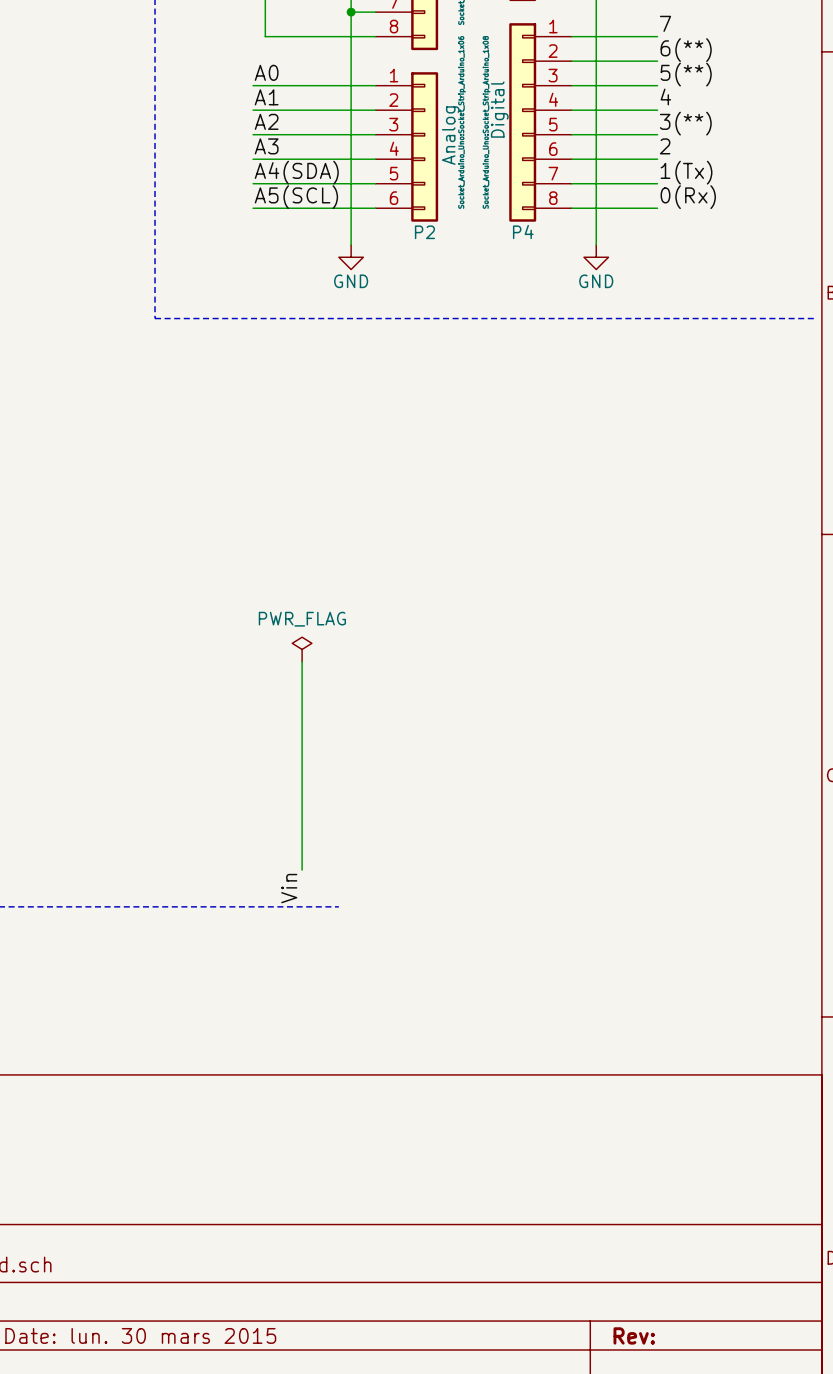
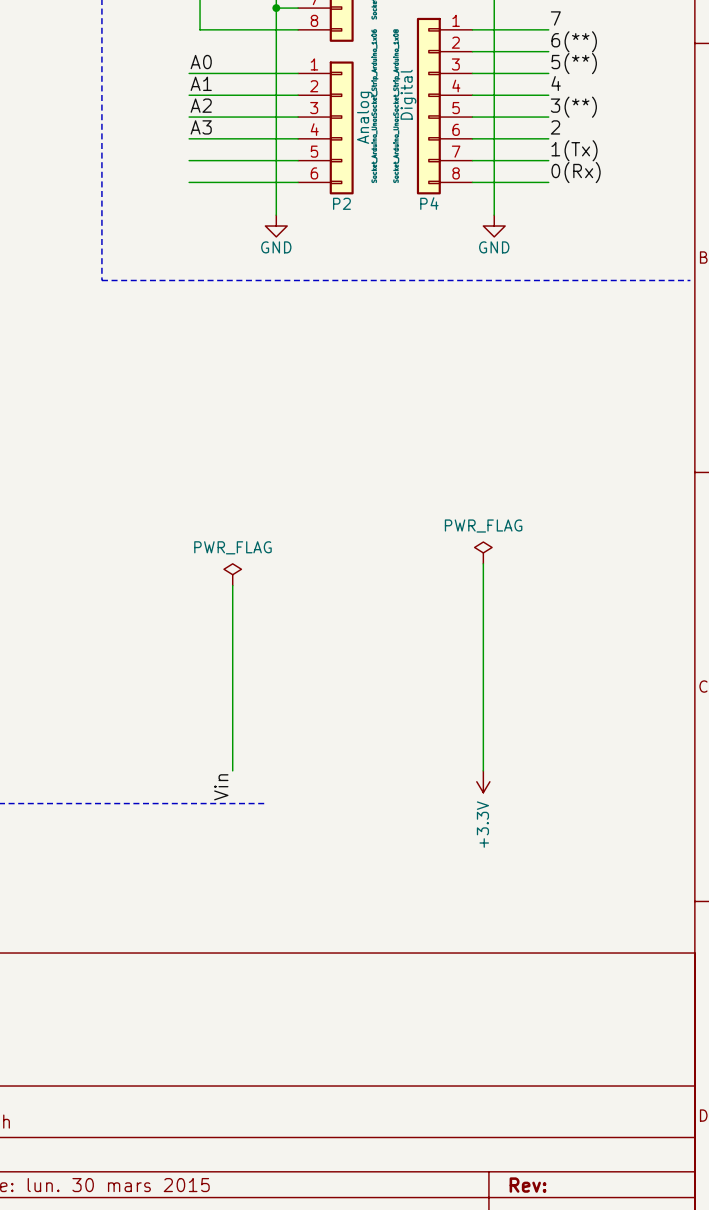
label: A4(SDA) (296, 172) -> none
label: A5(SCL) (296, 197) -> none
power symbol: none -> PWR_FLAG (483, 552)
wire: none -> (483, 563) (483, 770)
power symbol: none -> +3.3V (483, 781)

